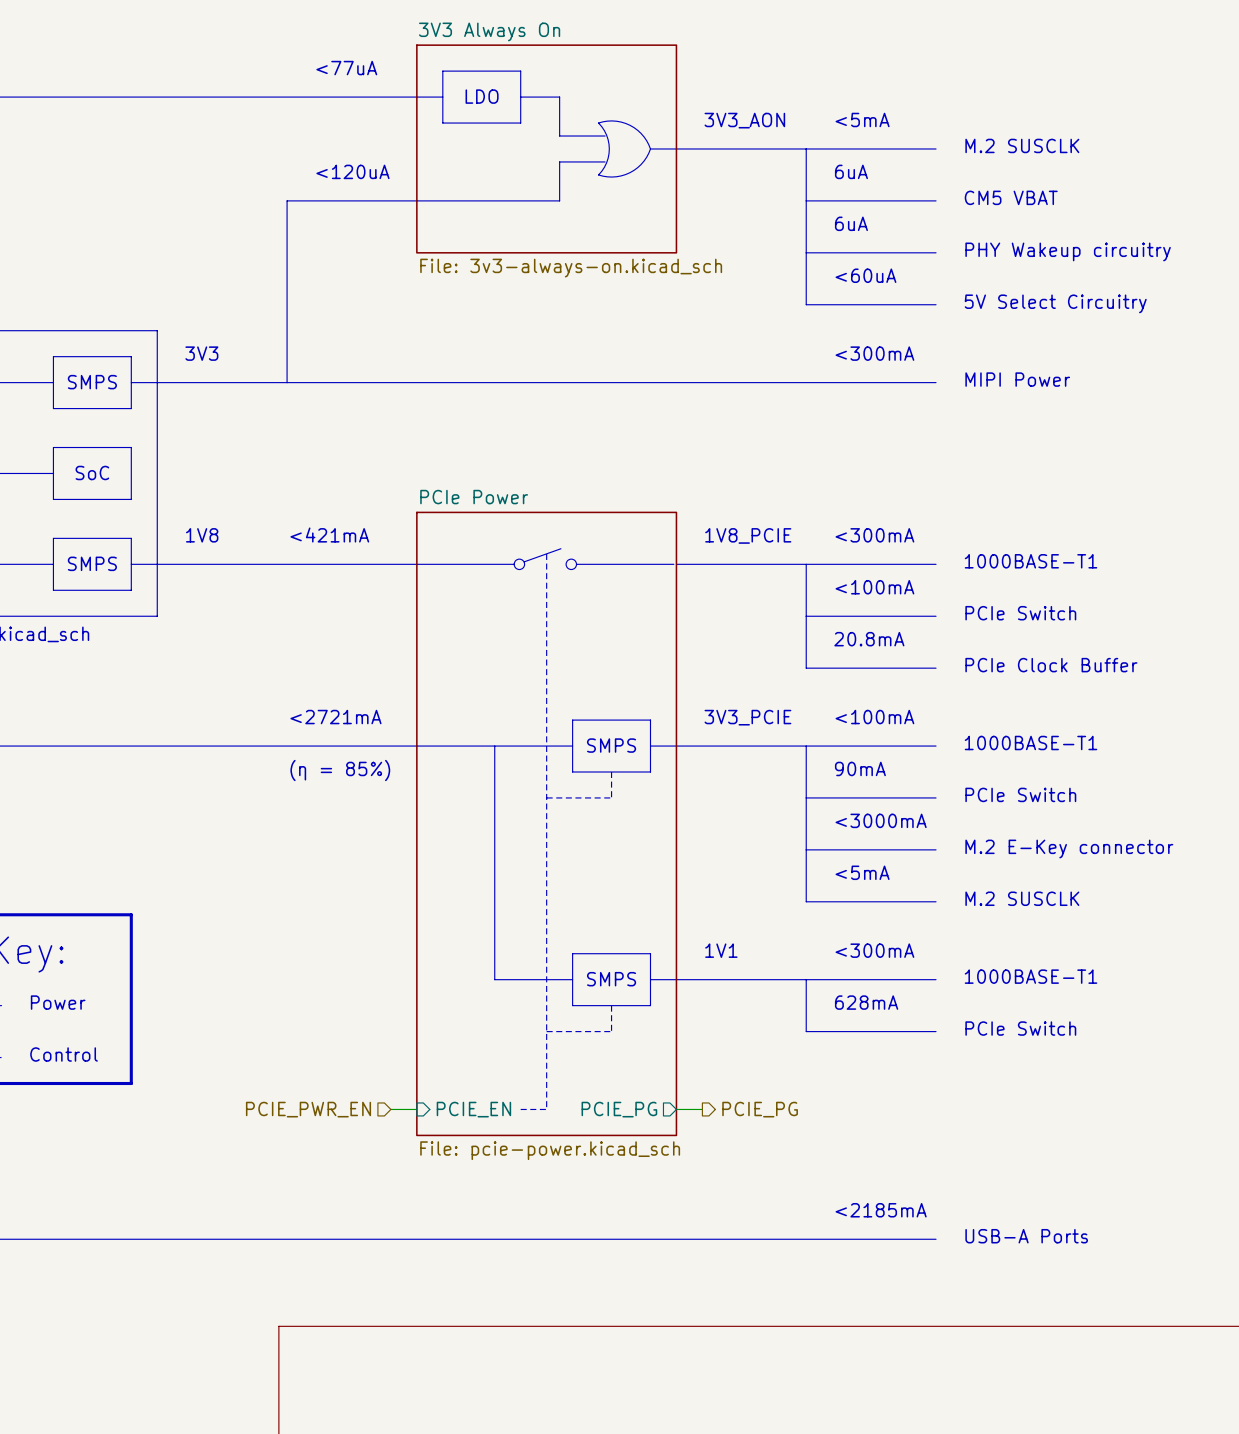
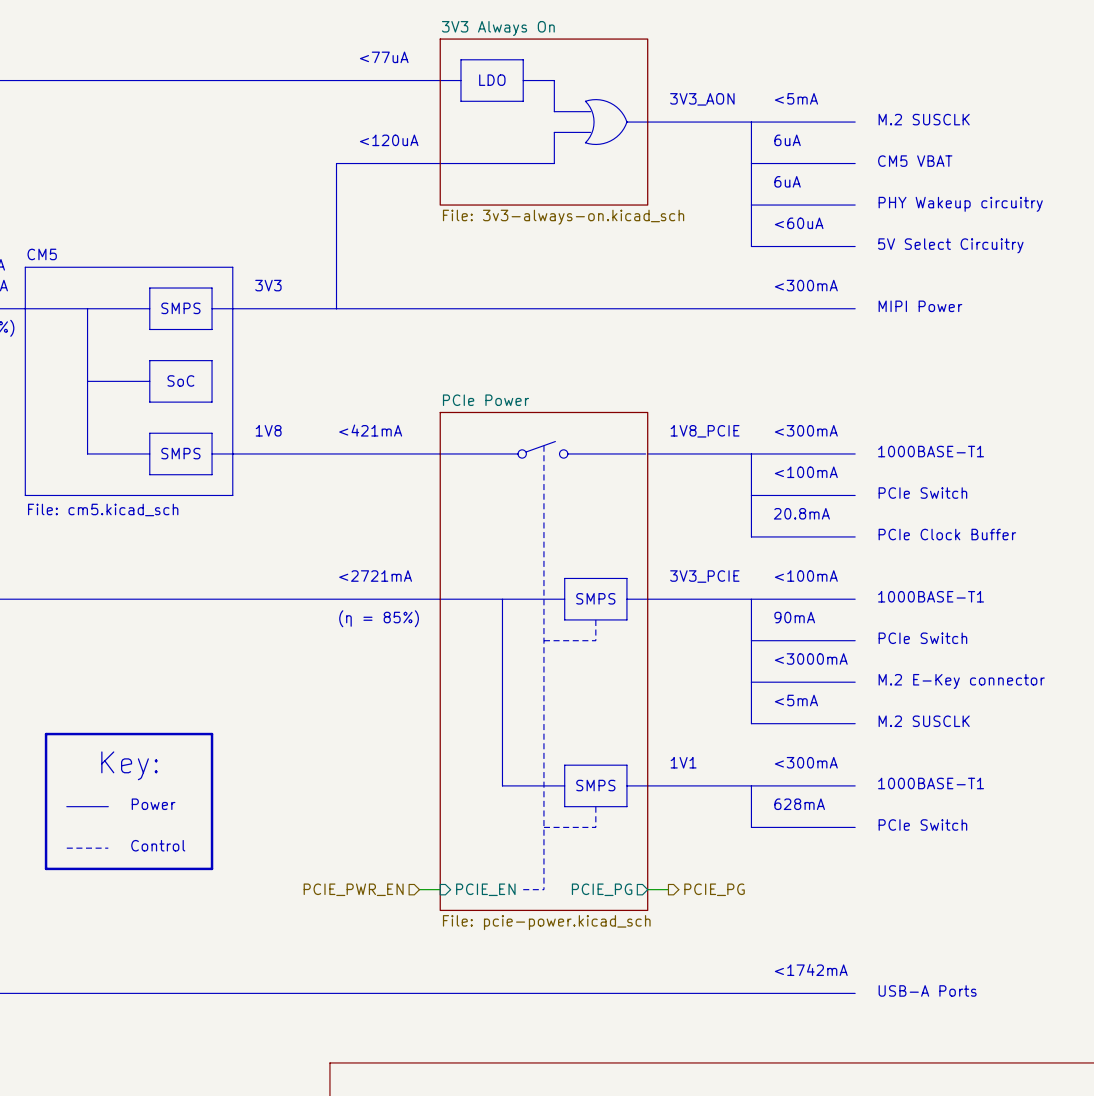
text: <2185mA (881, 1210) -> <1742mA (811, 969)

